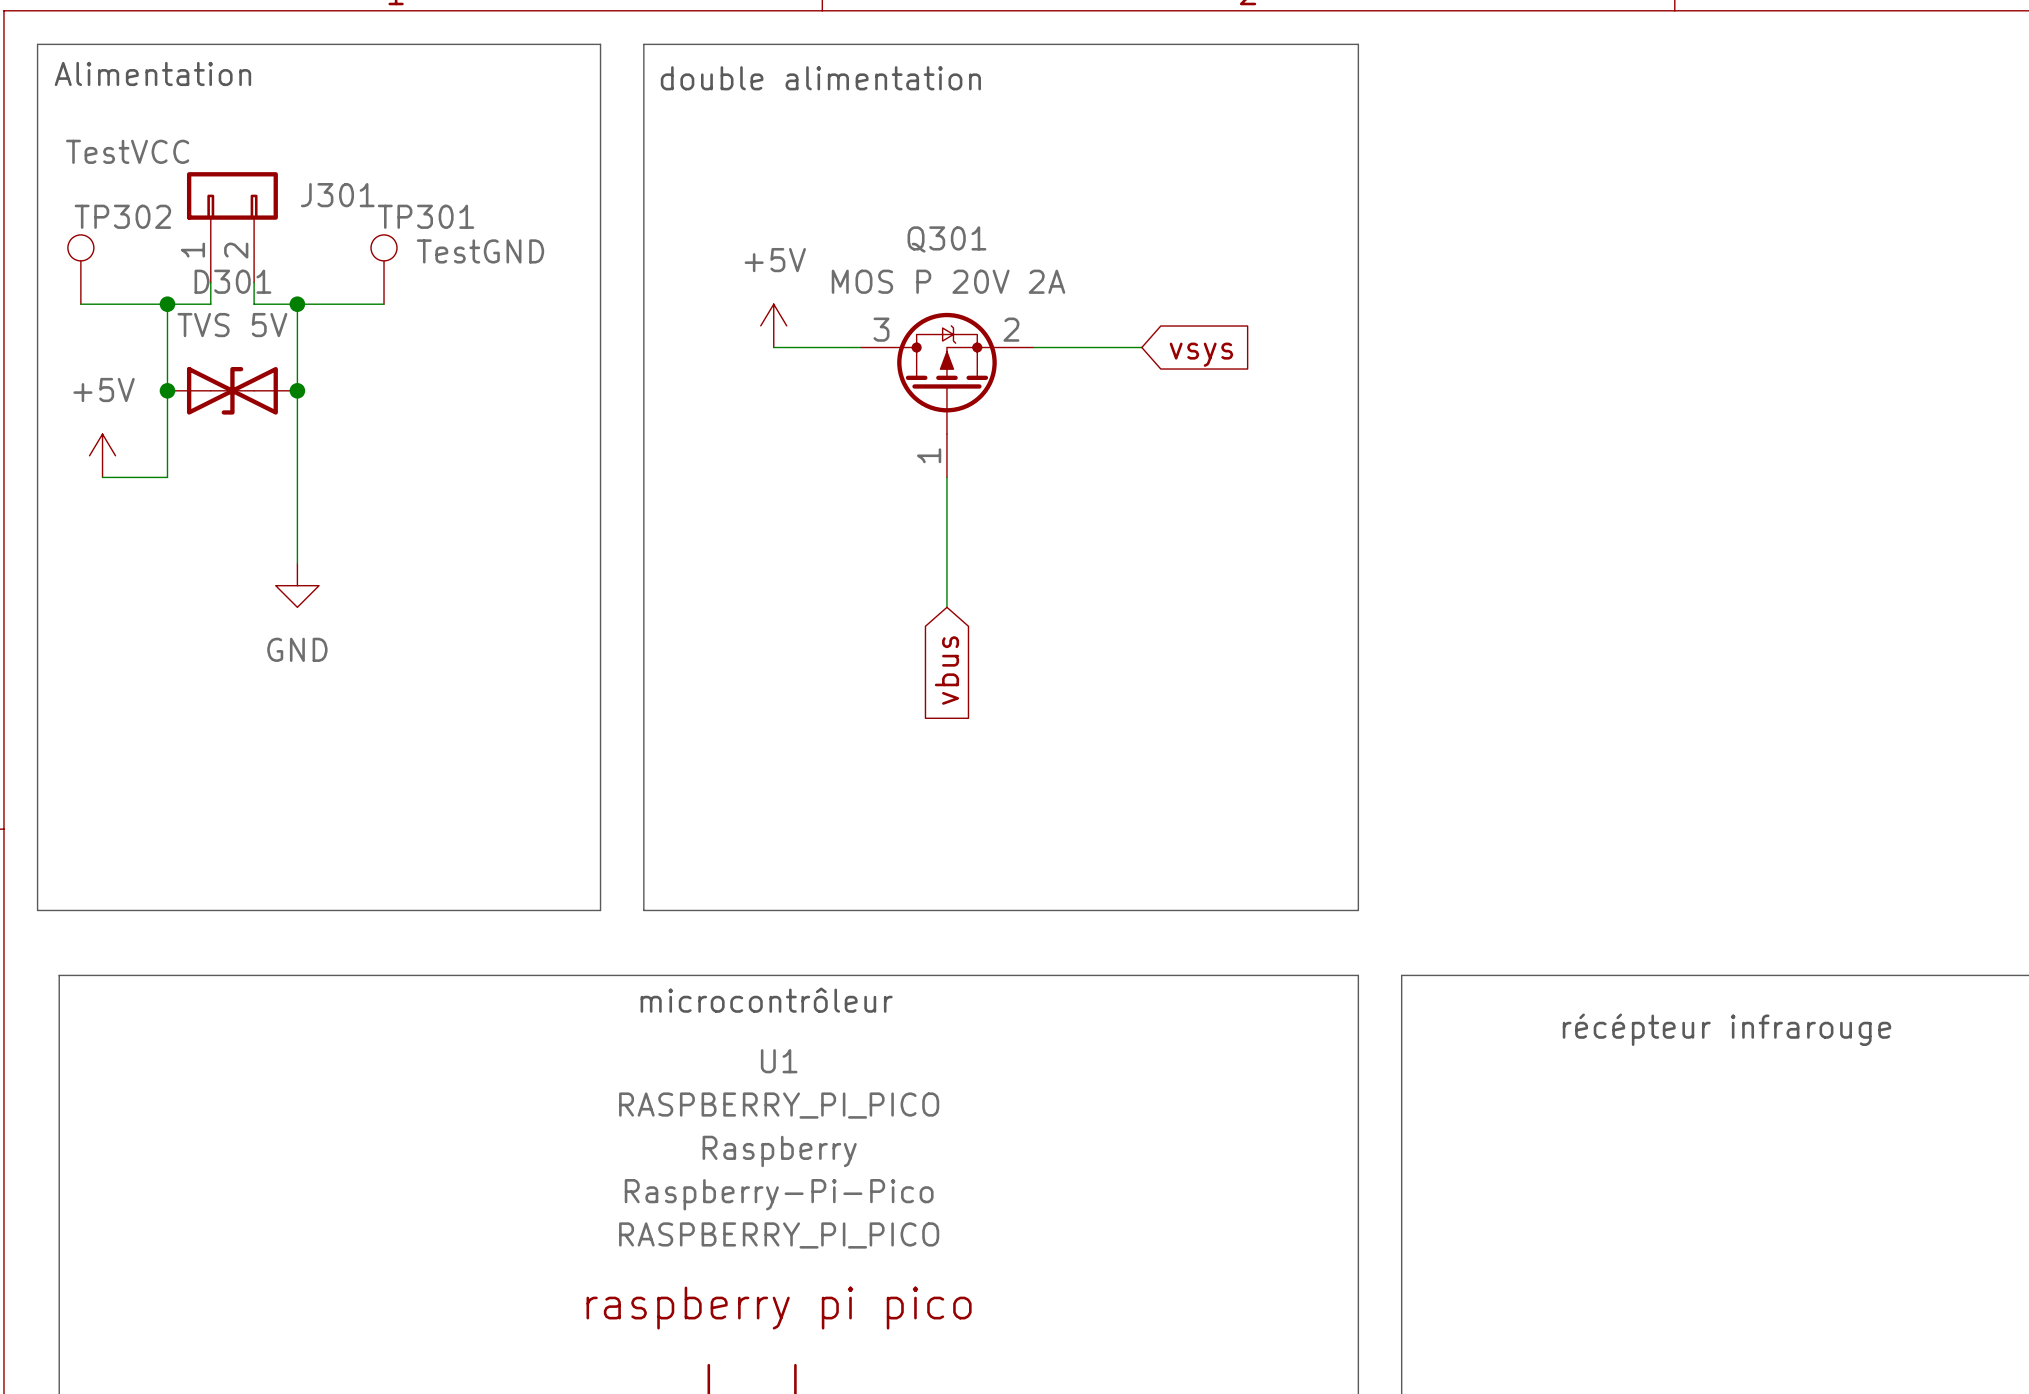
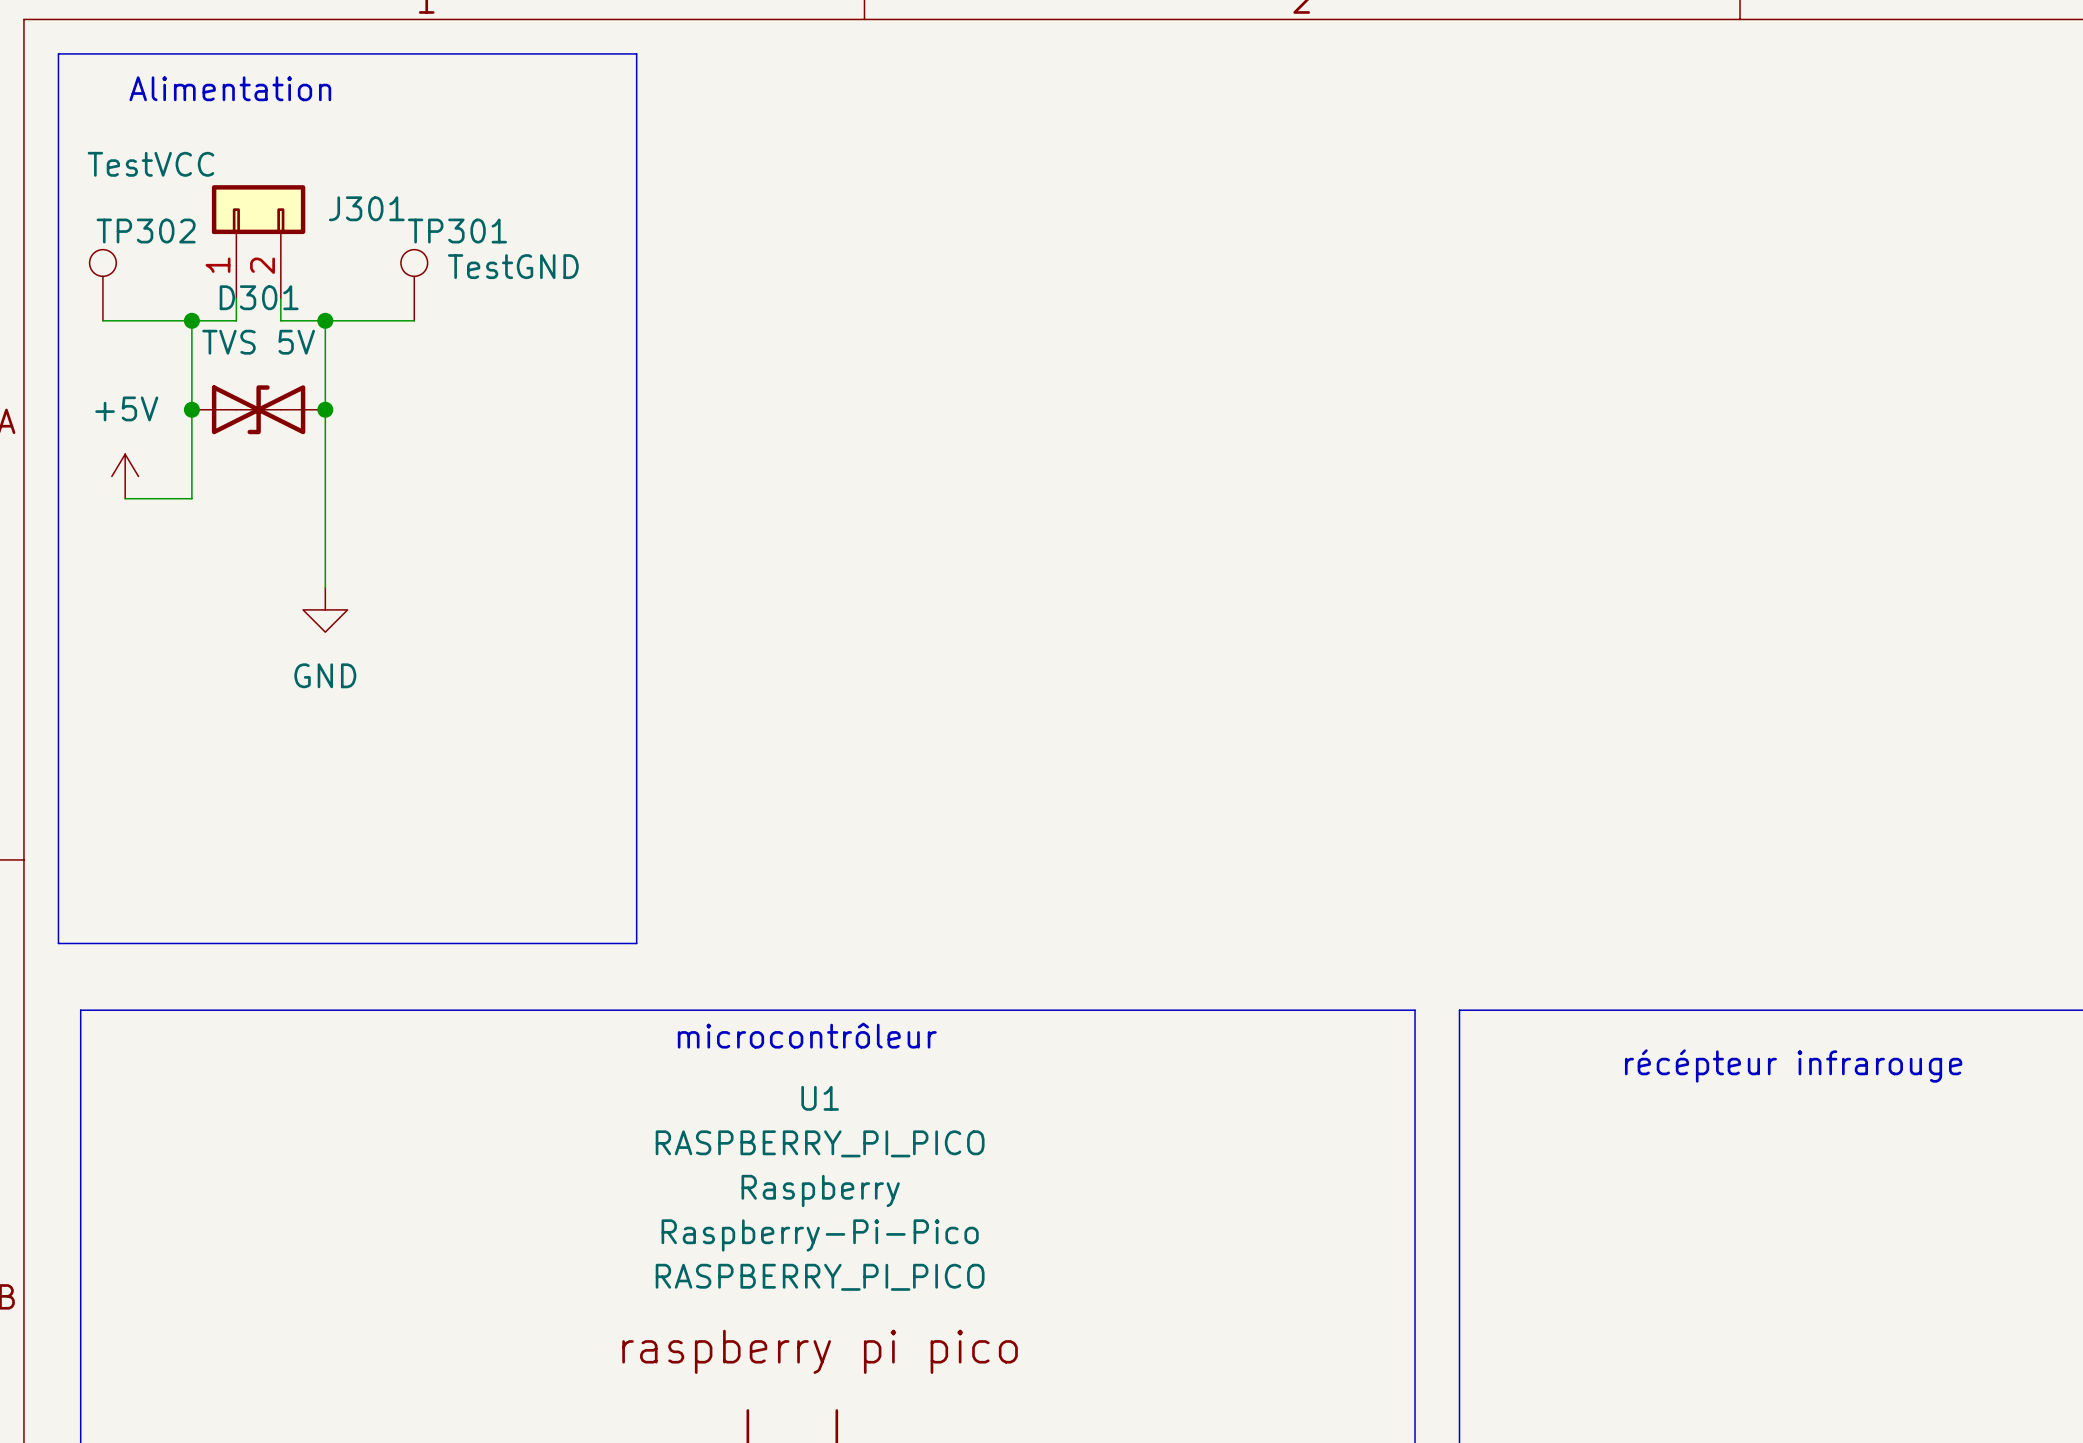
line: (643, 44) (1358, 44) (1358, 910) (643, 910) (643, 44) -> none
text position: Alimentation (152, 73) -> Alimentation (230, 88)
text: double alimentation (820, 78) -> none
power symbol: +5V (773, 325) -> none
wire: (773, 347) (860, 347) -> none
wire: (1033, 347) (1141, 347) -> none
global label: vsys (1201, 354) -> none
Q301: MOS P 20V 2A (946, 395) -> none
wire: (946, 477) (946, 607) -> none
global label: vbus (946, 670) -> none

